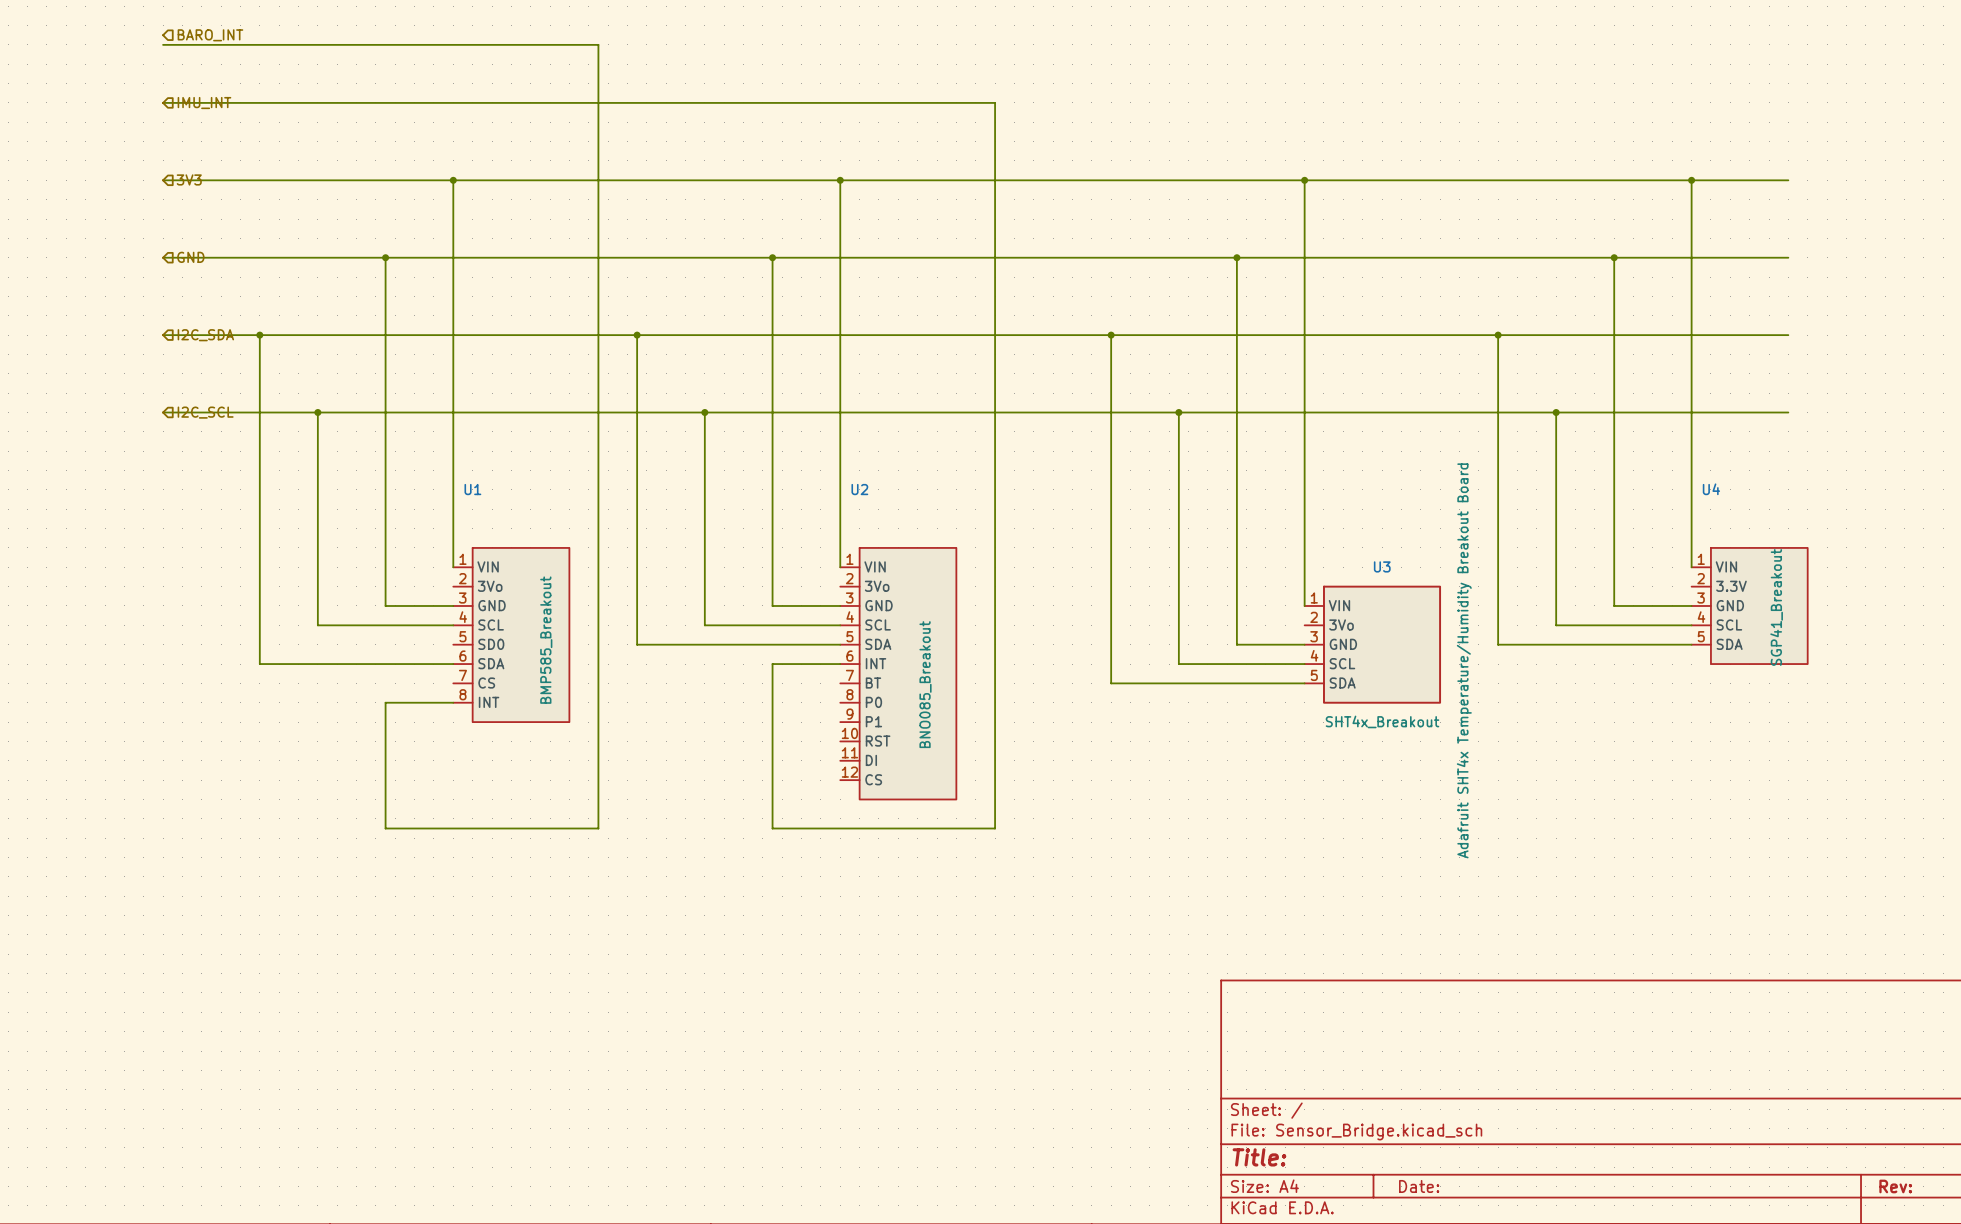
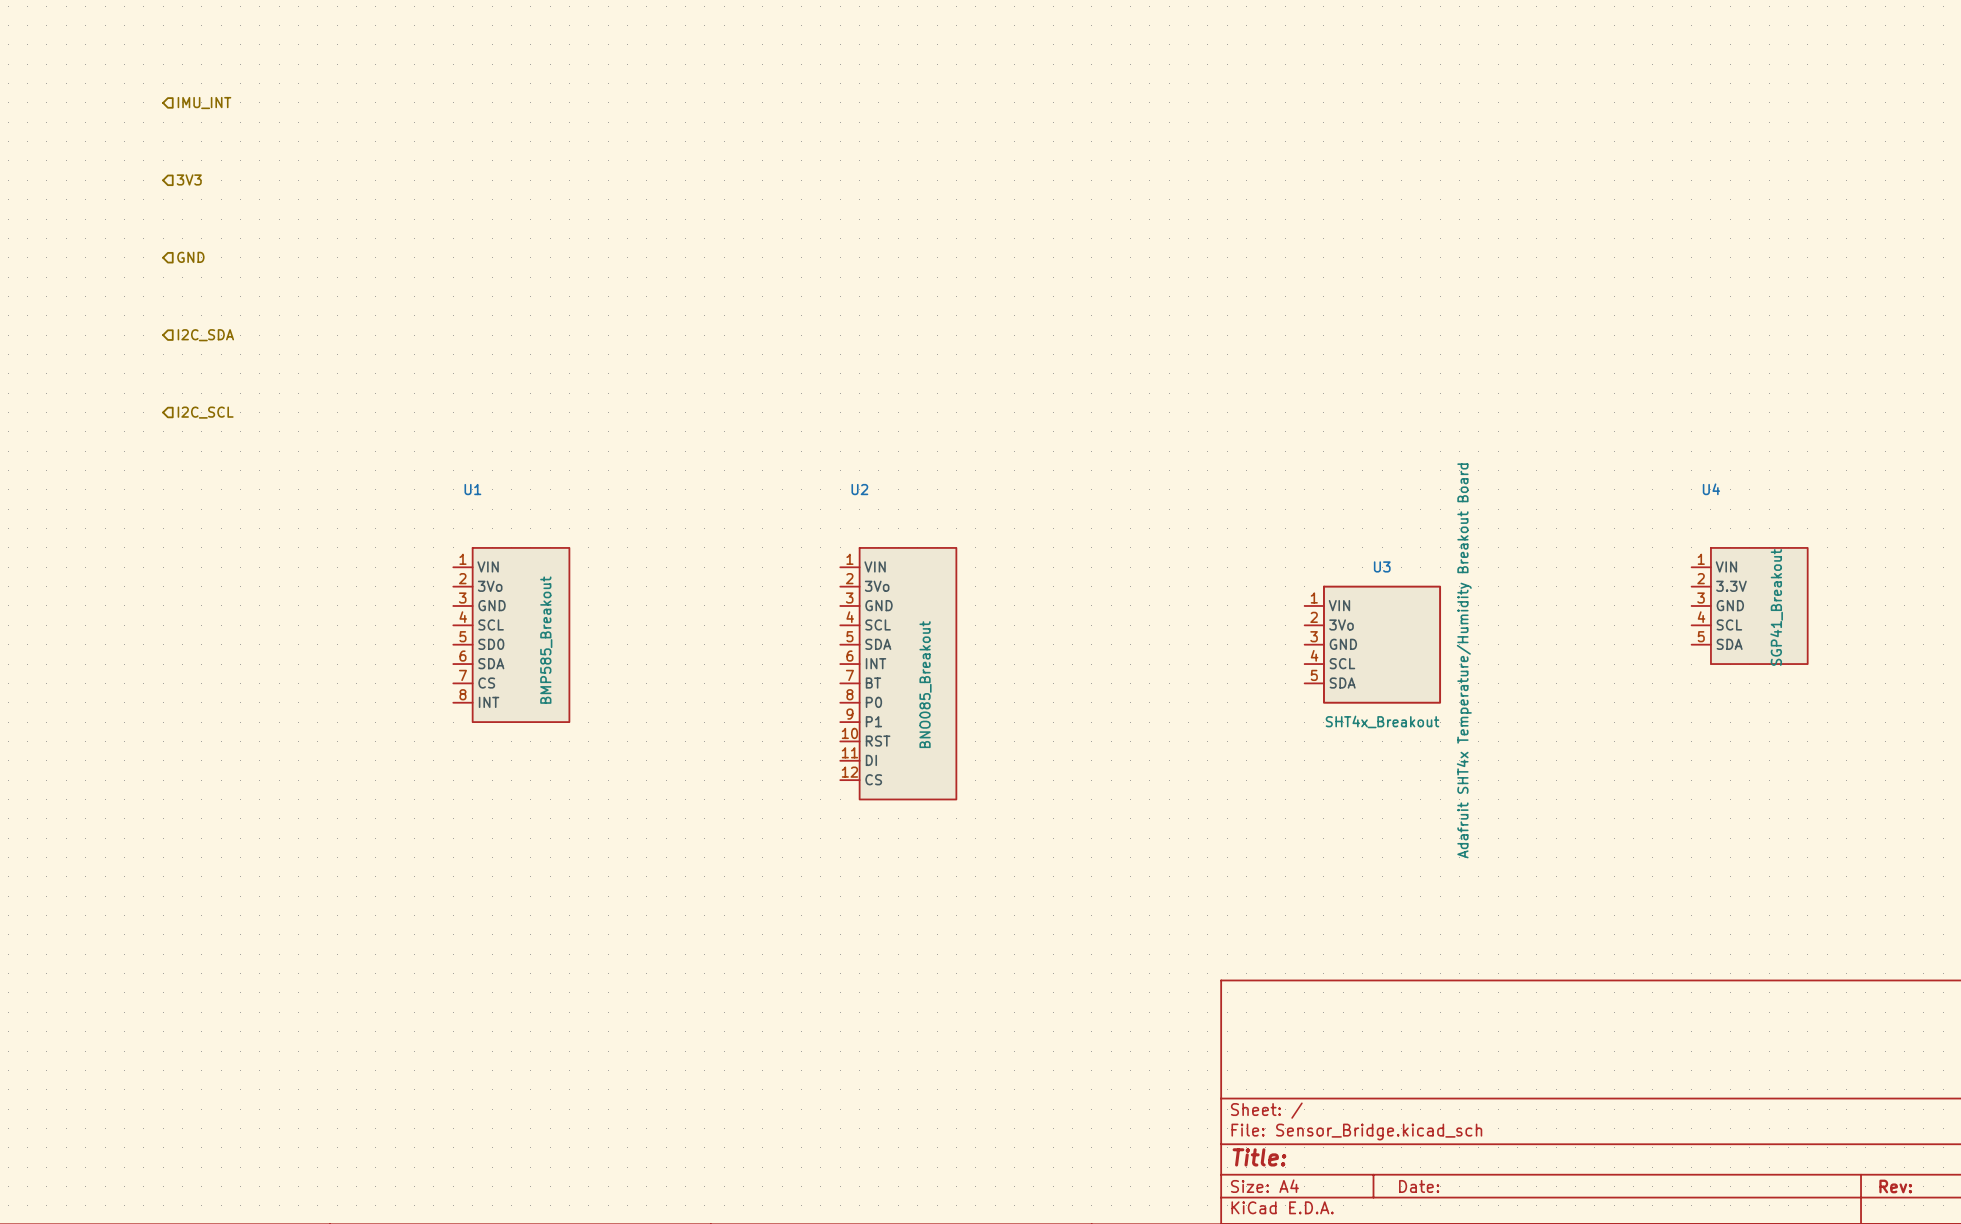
hierarchical label: BARO_INT (210, 35) -> none
wire: (163, 44) (598, 44) (598, 828) (385, 828) (385, 702) (453, 702) -> none
wire: (163, 102) (995, 102) (995, 828) (772, 828) (772, 664) (840, 664) -> none
wire: (163, 180) (1788, 180) -> none
wire: (453, 180) (453, 567) -> none
junction: (453, 180) -> none
wire: (840, 180) (840, 567) -> none
junction: (840, 180) -> none
wire: (1304, 180) (1304, 605) -> none
junction: (1304, 180) -> none
wire: (1691, 180) (1691, 567) -> none
junction: (1691, 180) -> none
wire: (163, 257) (1788, 257) -> none
wire: (385, 257) (385, 605) (453, 605) -> none
junction: (385, 257) -> none
wire: (772, 257) (772, 605) (840, 605) -> none
junction: (772, 257) -> none
wire: (1236, 257) (1236, 644) (1304, 644) -> none
junction: (1236, 257) -> none
wire: (1614, 257) (1614, 605) (1691, 605) -> none
junction: (1614, 257) -> none
wire: (163, 335) (1788, 335) -> none
wire: (259, 335) (259, 664) (453, 664) -> none
junction: (259, 335) -> none
wire: (637, 335) (637, 644) (840, 644) -> none
junction: (637, 335) -> none
wire: (1111, 335) (1111, 683) (1304, 683) -> none
junction: (1111, 335) -> none
wire: (1498, 335) (1498, 644) (1691, 644) -> none
junction: (1498, 335) -> none
wire: (163, 412) (1788, 412) -> none
wire: (317, 412) (317, 625) (453, 625) -> none
junction: (317, 412) -> none
wire: (704, 412) (704, 625) (840, 625) -> none
junction: (704, 412) -> none
wire: (1178, 412) (1178, 664) (1304, 664) -> none
junction: (1178, 412) -> none
wire: (1556, 412) (1556, 625) (1691, 625) -> none
junction: (1556, 412) -> none

